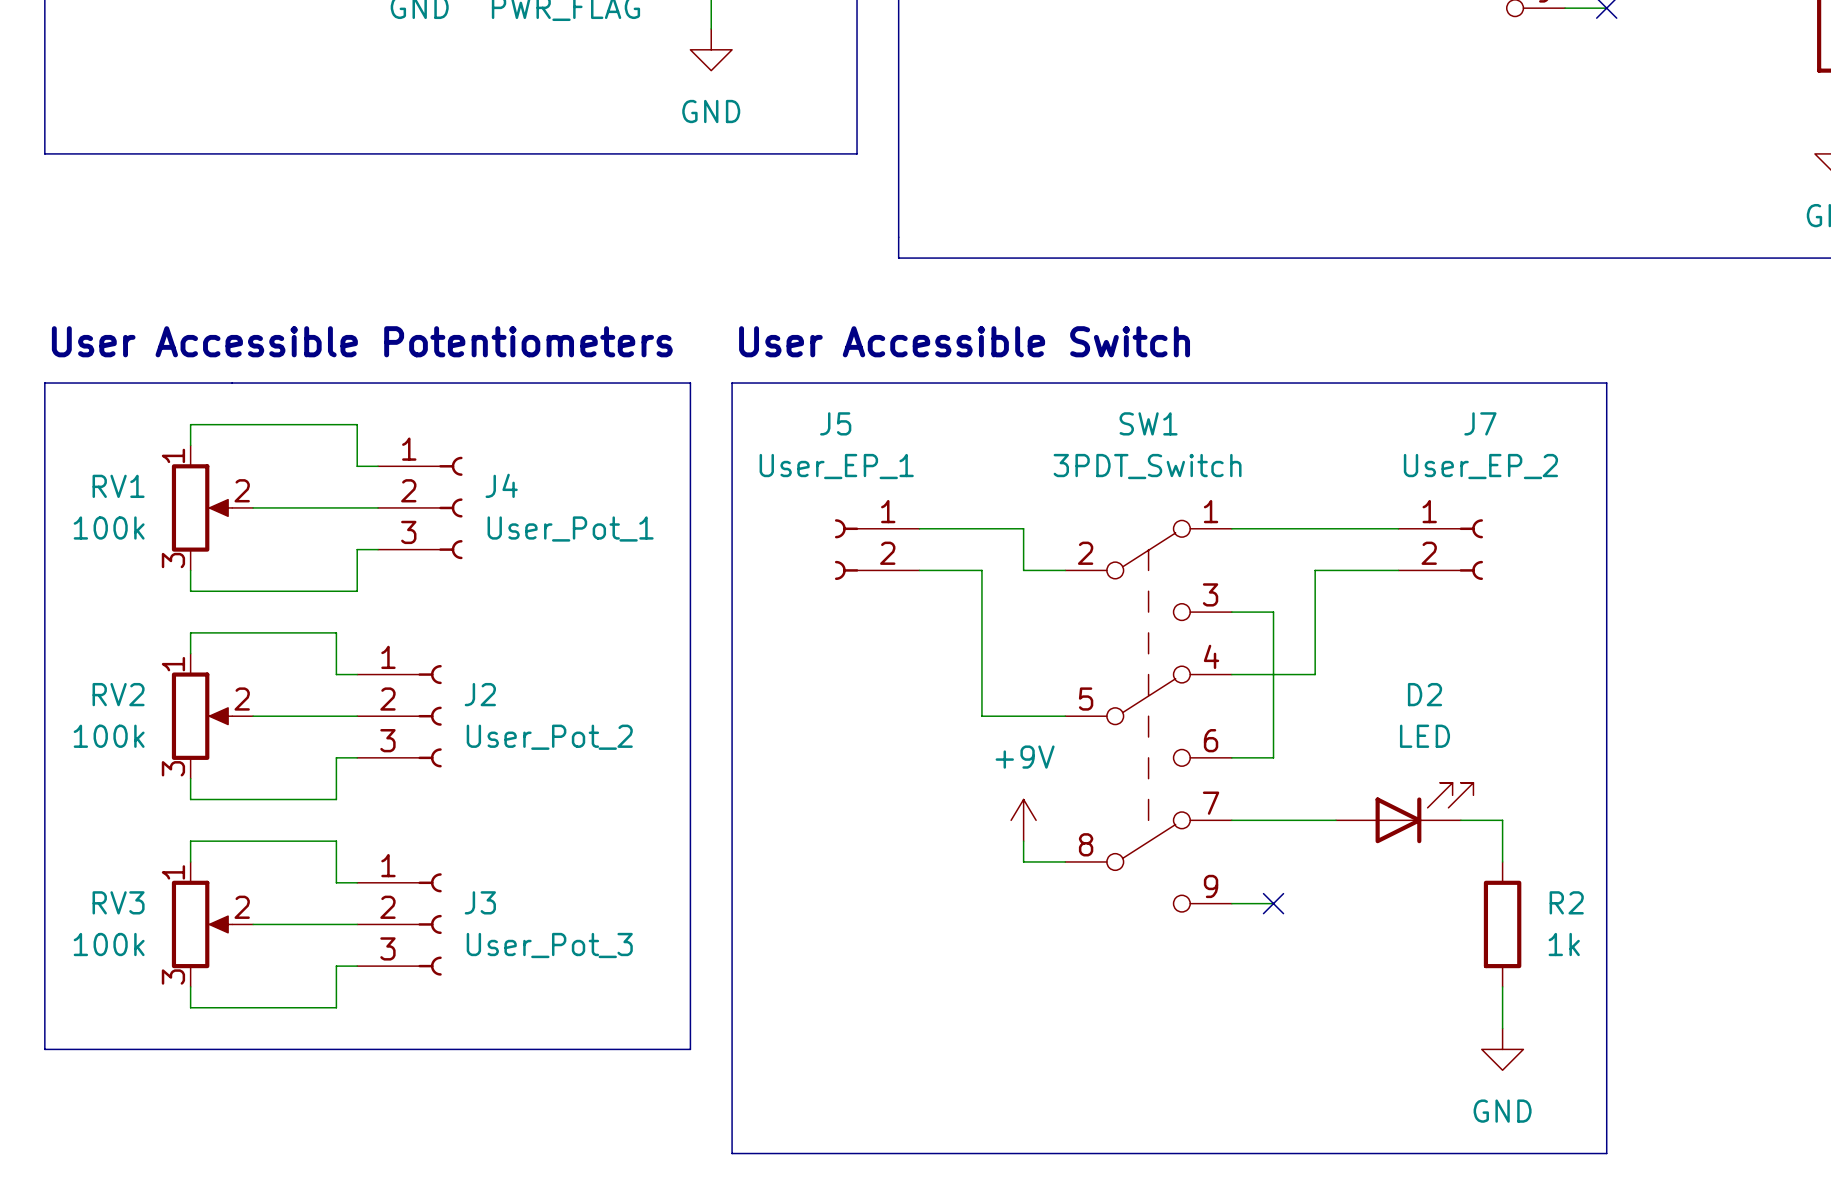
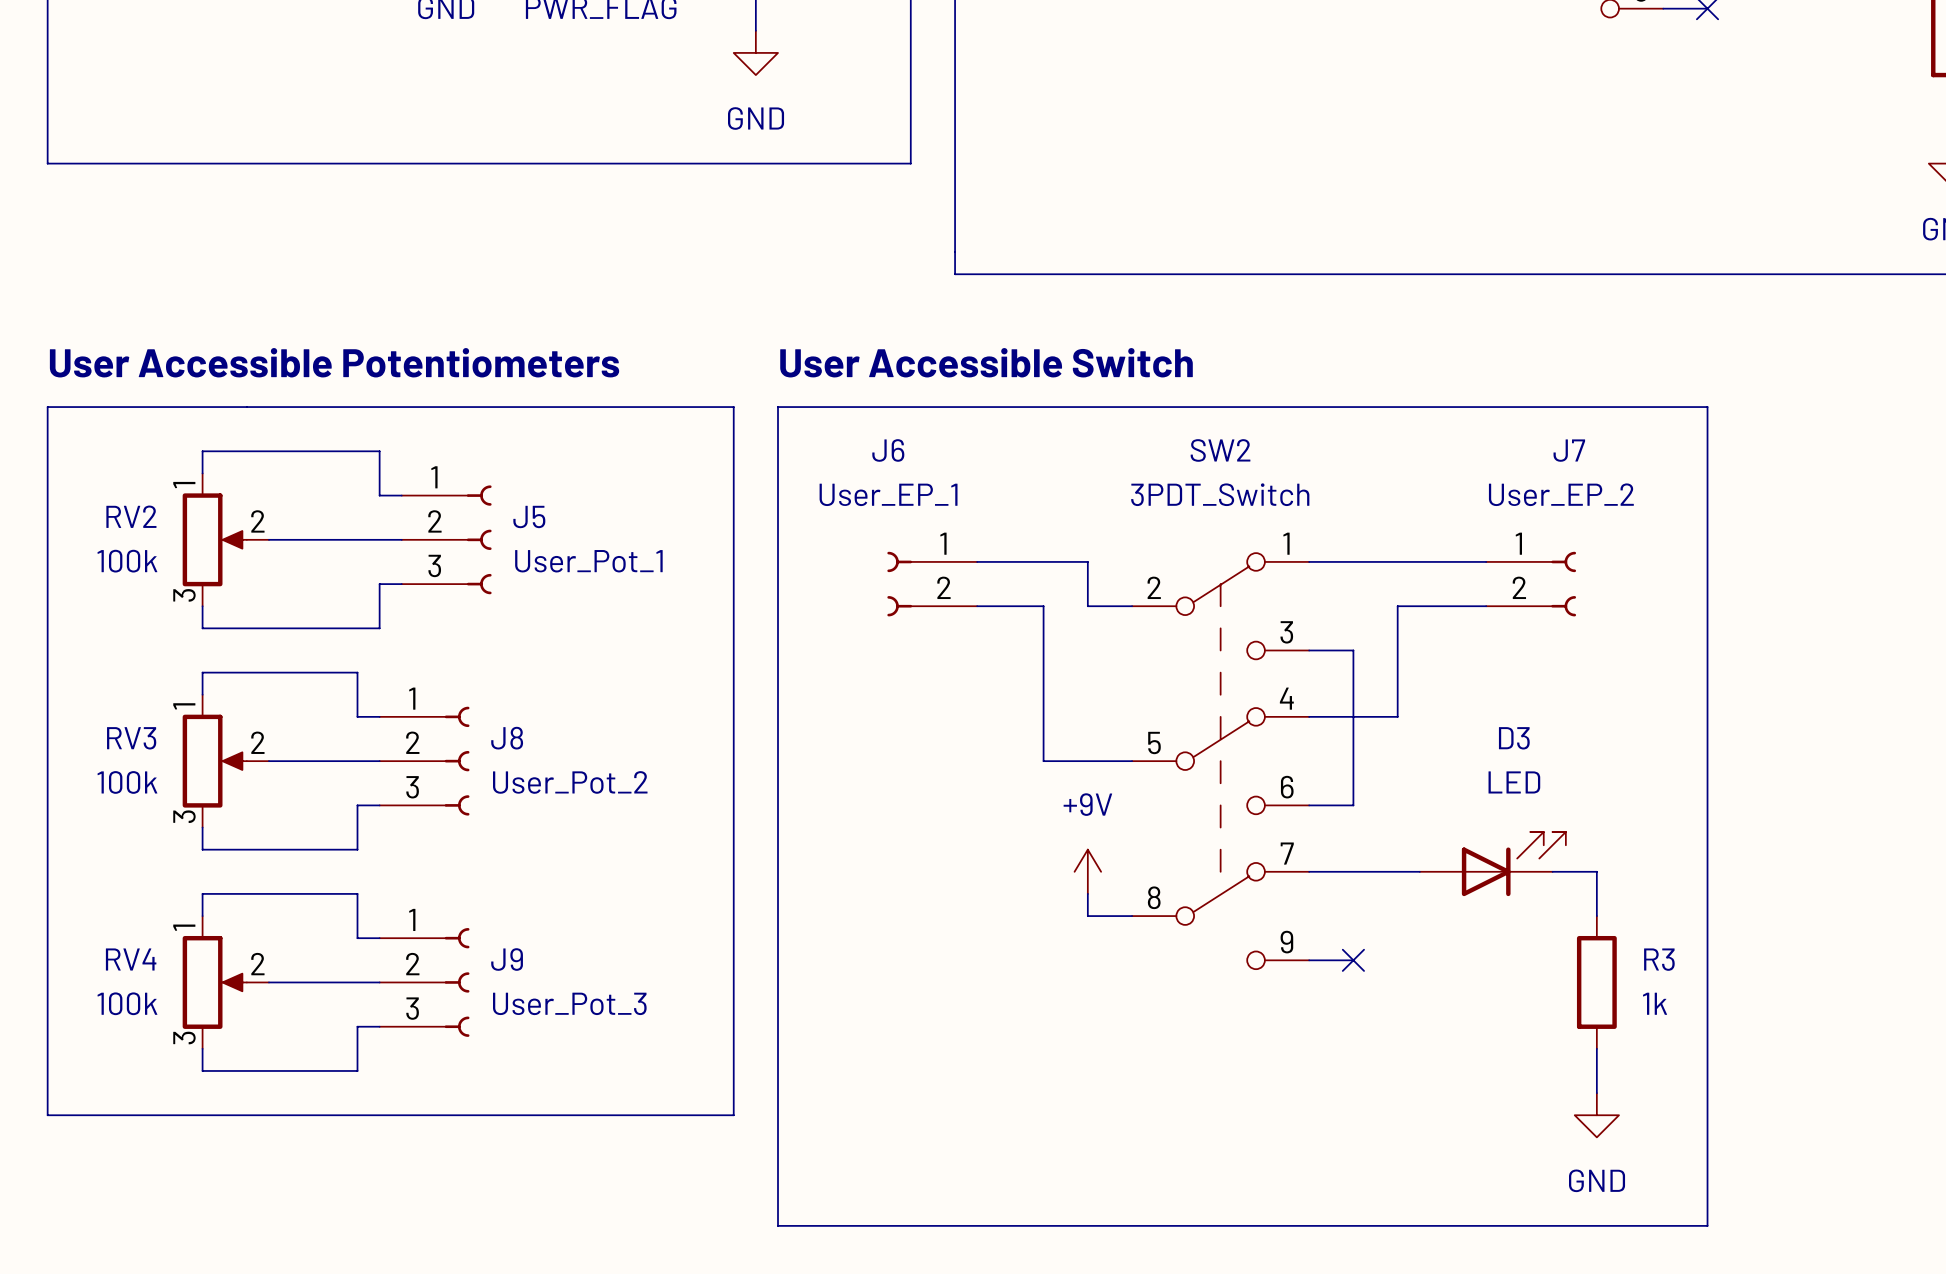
J5 name: J5 (835, 423) -> J6 (888, 450)
SW1 name: SW1 (1148, 423) -> SW2 (1220, 450)
J4 name: J4 (501, 485) -> J5 (529, 516)
RV1 name: RV1 (118, 486) -> RV2 (131, 516)
RV2 name: RV2 (118, 694) -> RV3 (131, 738)
J2 name: J2 (480, 694) -> J8 (507, 738)
D2 name: D2 (1424, 694) -> D3 (1514, 738)
RV3 name: RV3 (118, 902) -> RV4 (131, 959)
J3 name: J3 (480, 902) -> J9 (507, 959)
R2 name: R2 (1566, 902) -> R3 (1659, 959)

